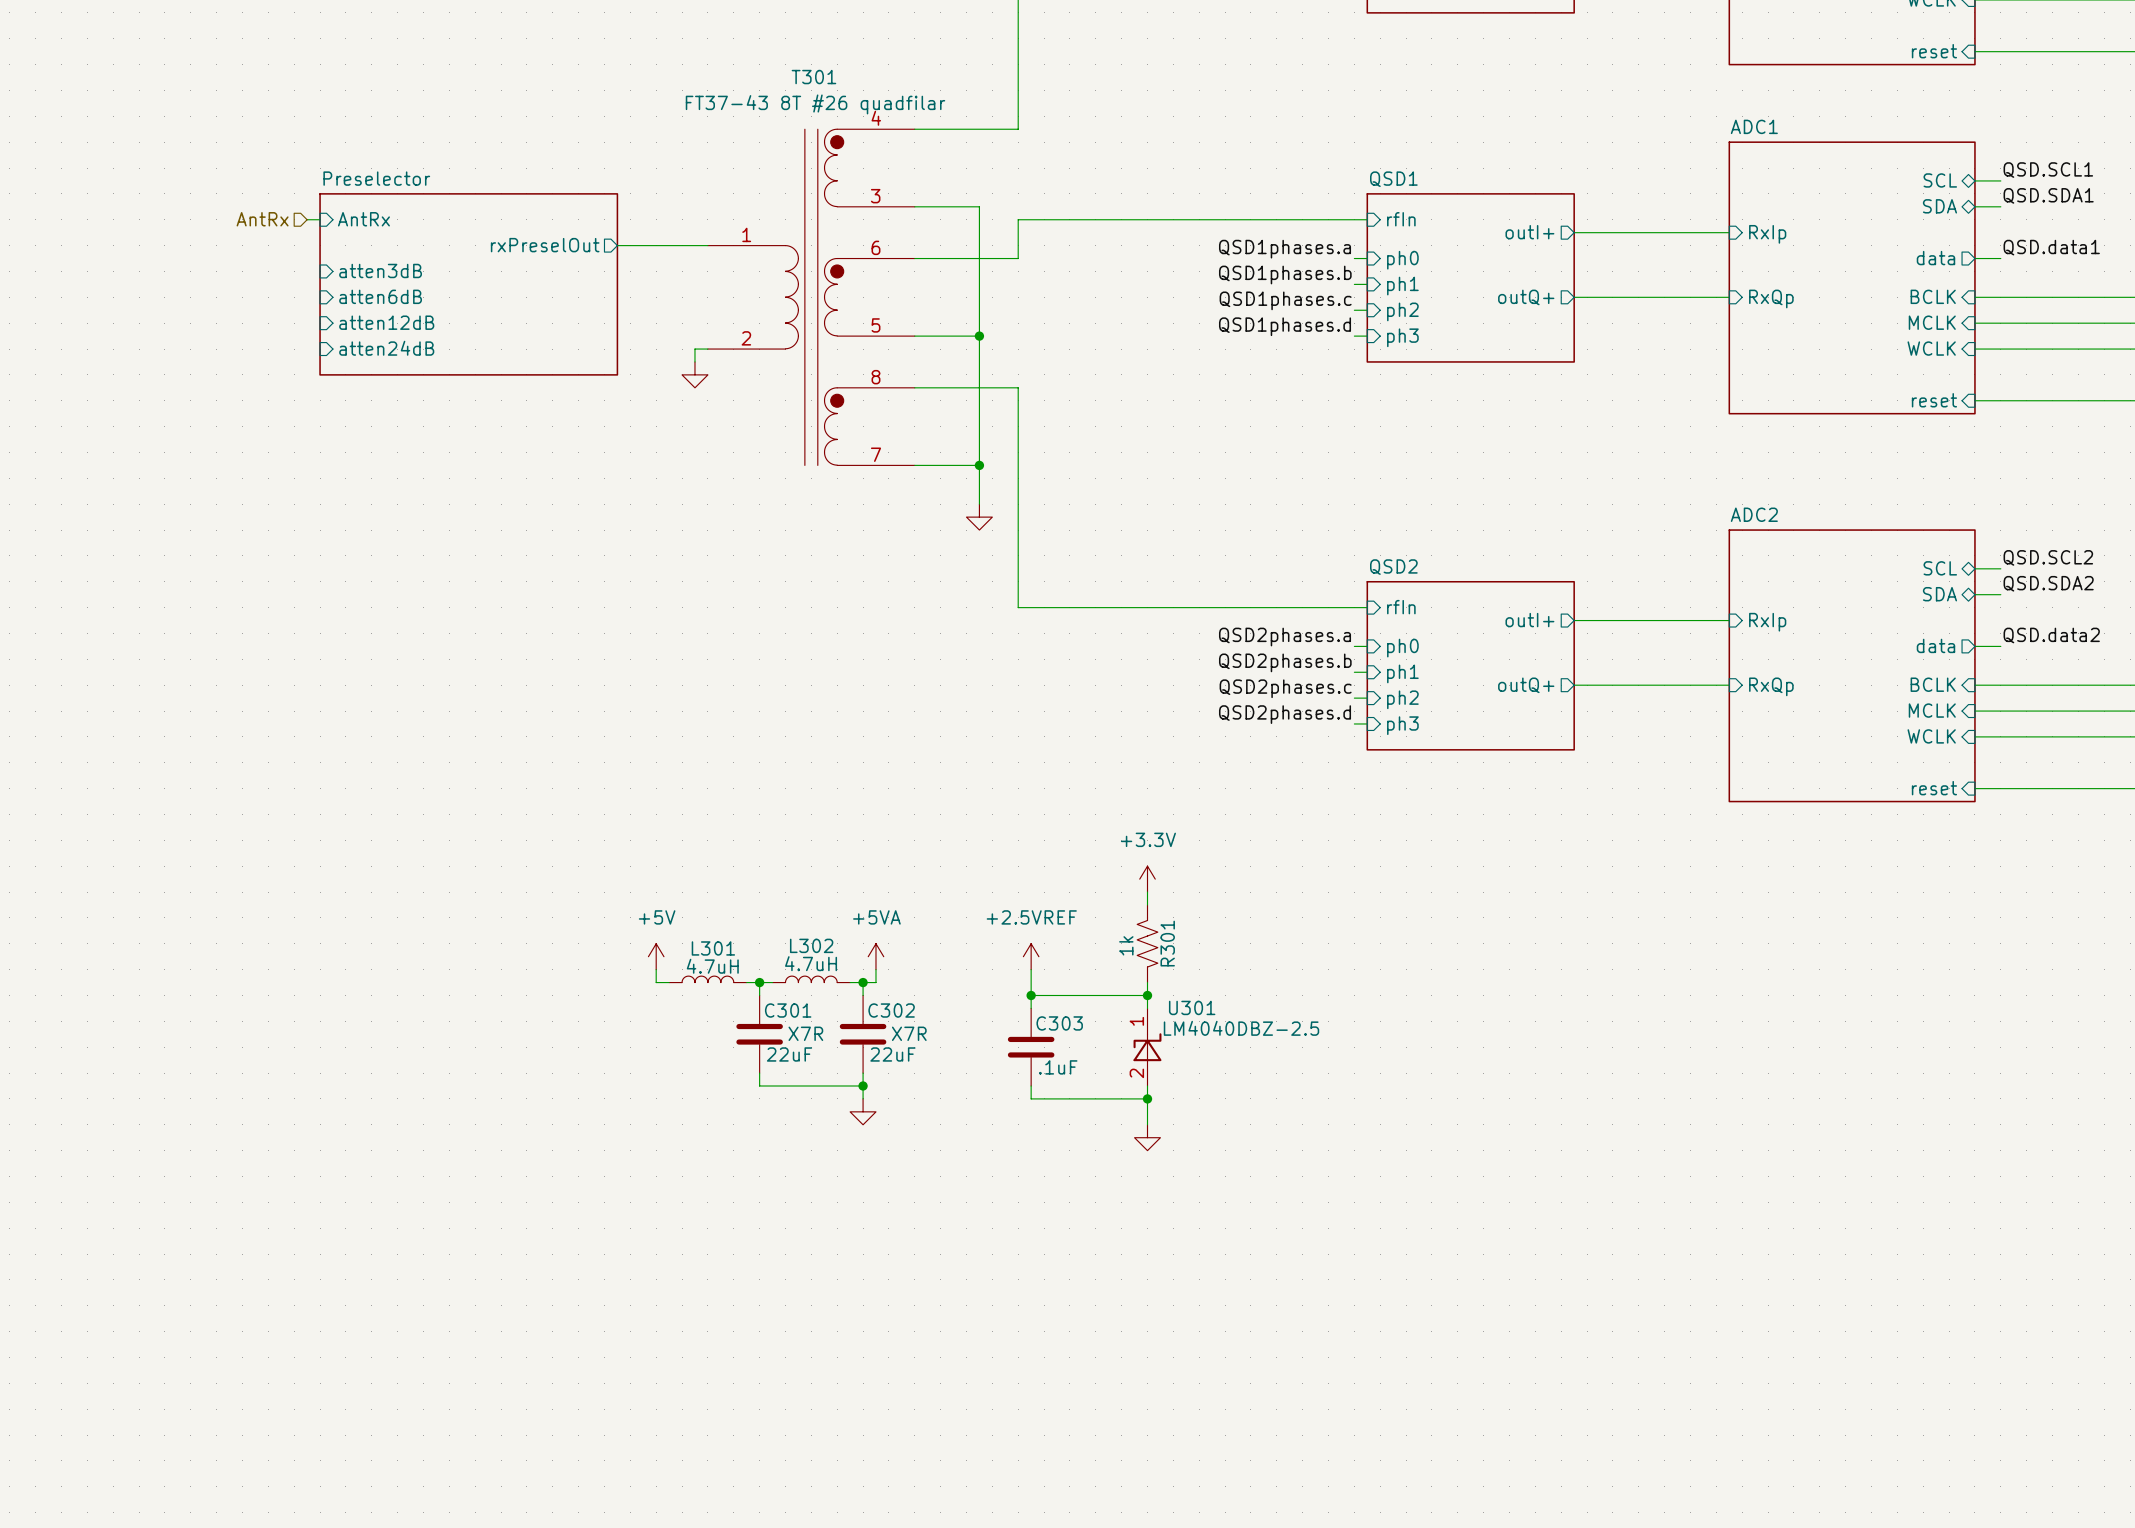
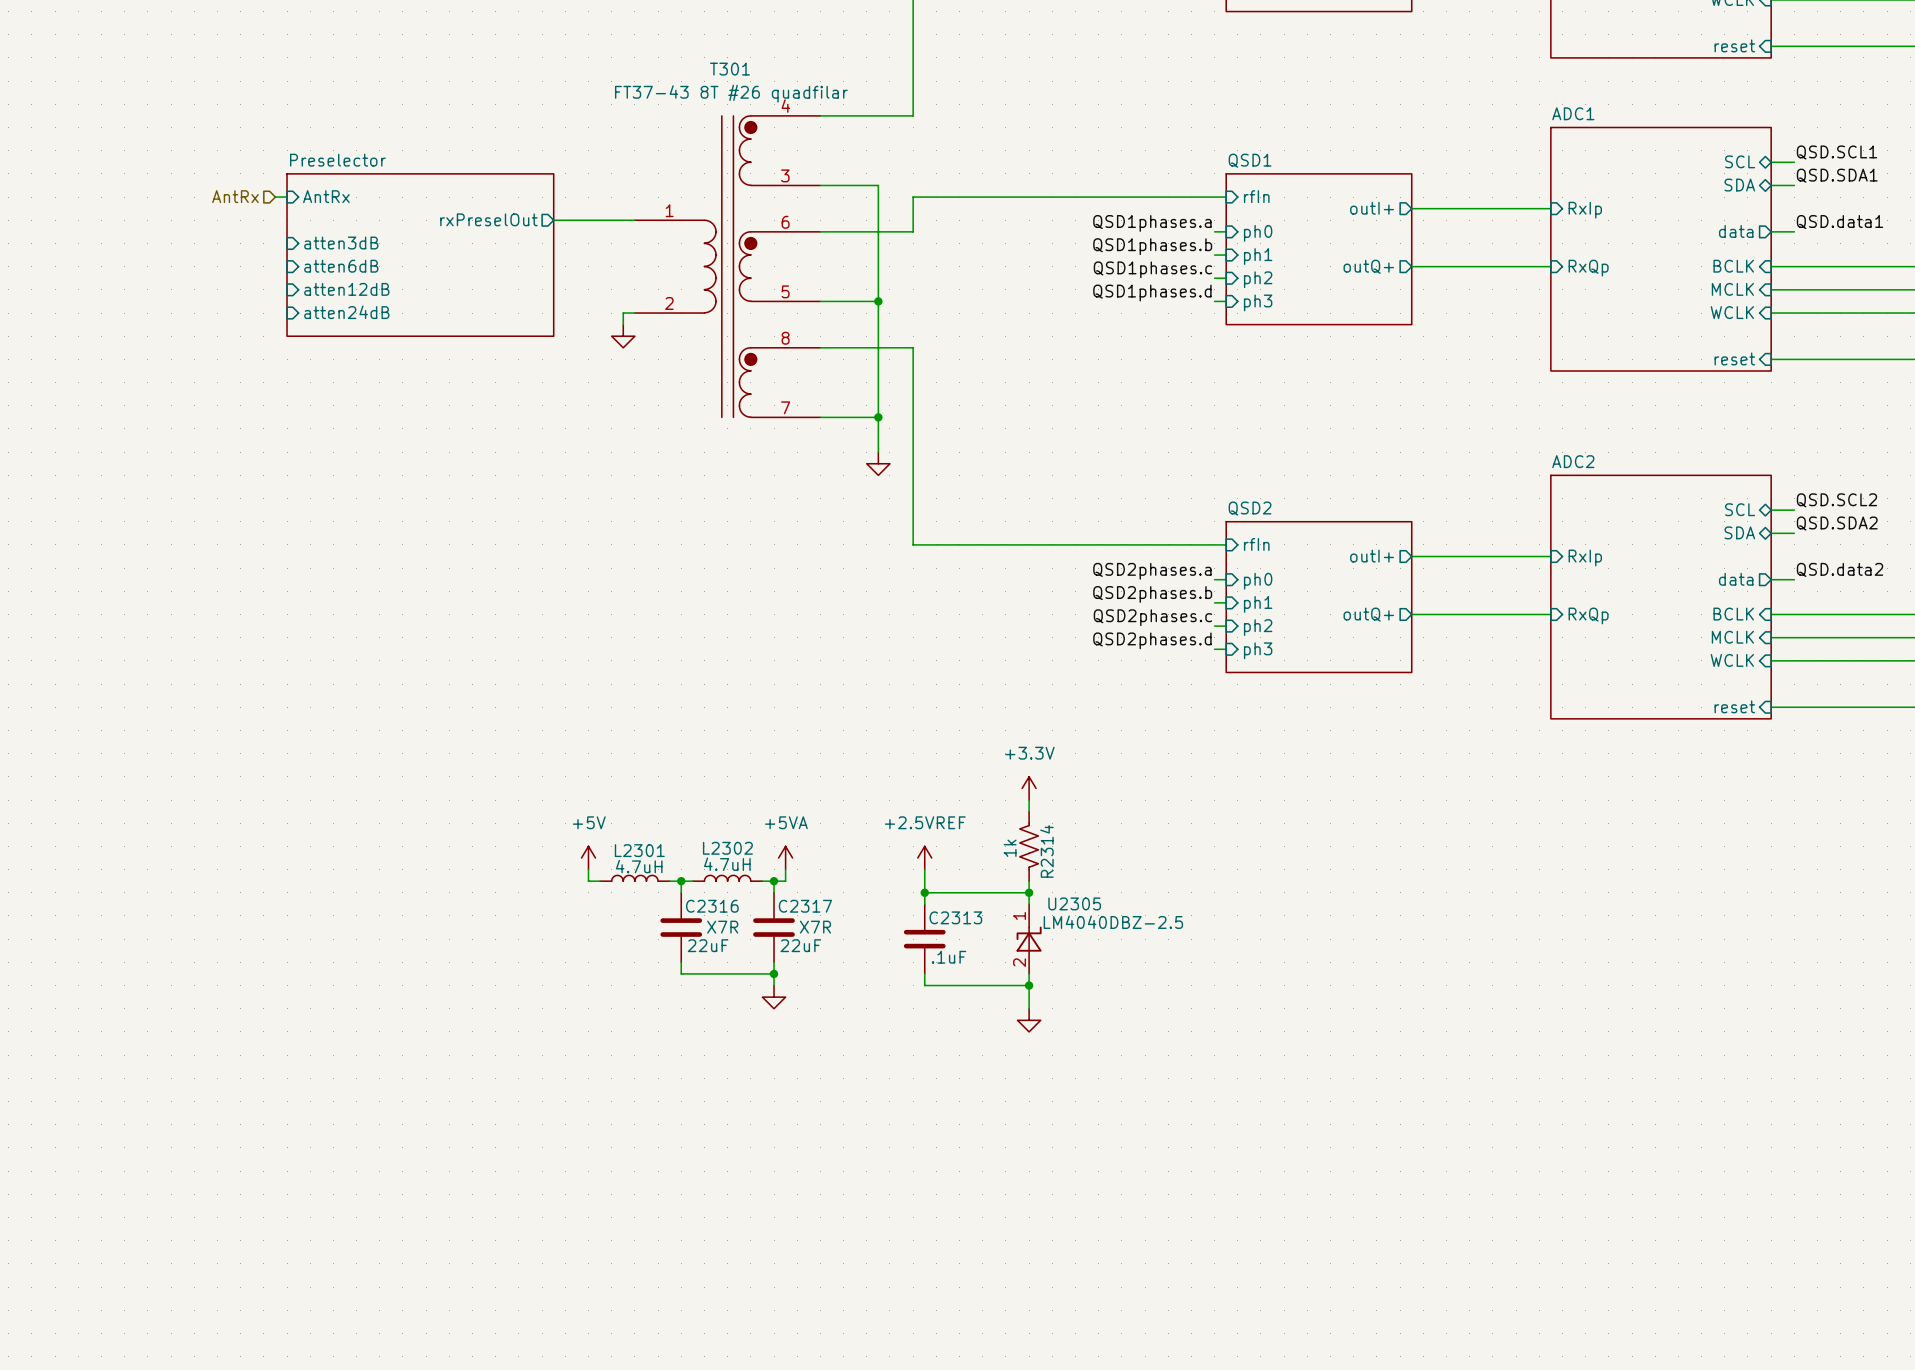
R301 name: R301 (1167, 943) -> R2314 (1046, 851)
L302 name: L302 (811, 945) -> L2302 (727, 848)
L301 name: L301 (713, 948) -> L2301 (639, 850)
U301 name: U301 (1192, 1007) -> U2305 (1074, 903)
C301 name: C301 (788, 1010) -> C2316 (712, 906)
C302 name: C302 (891, 1010) -> C2317 (805, 906)
C303 name: C303 (1059, 1023) -> C2313 (955, 917)

